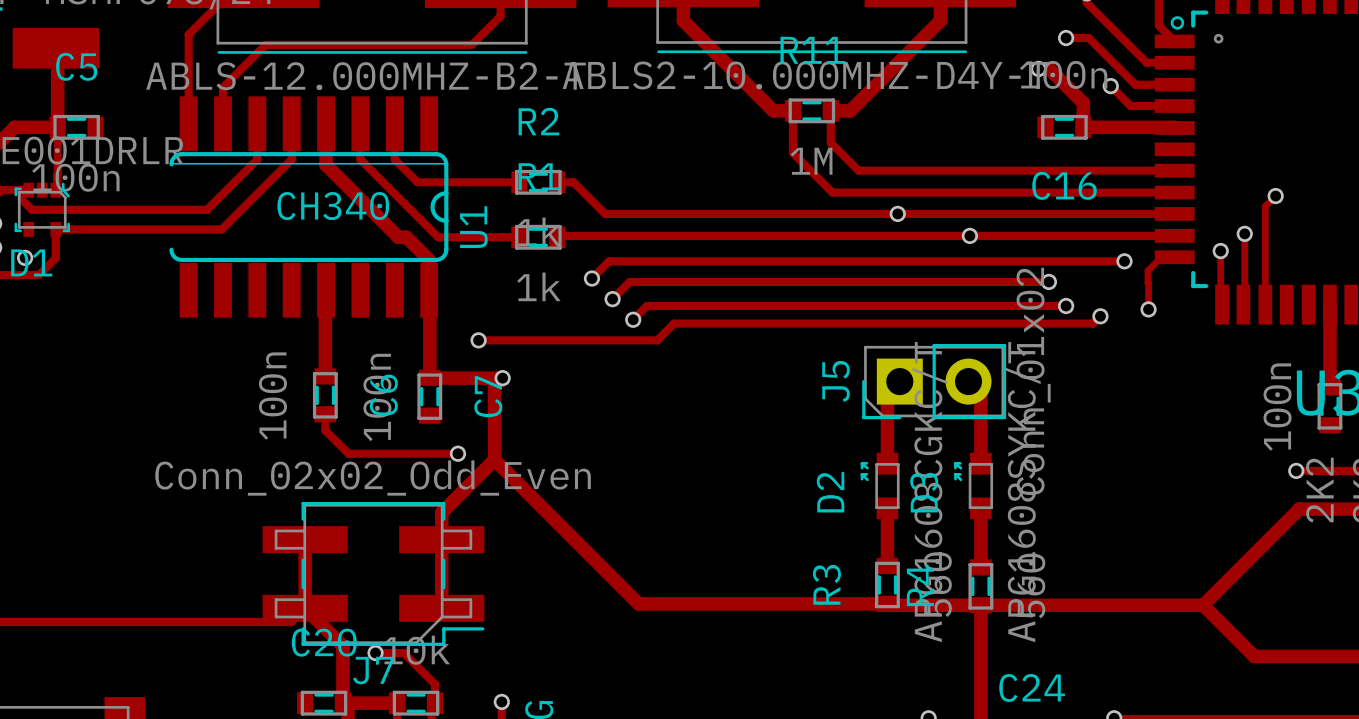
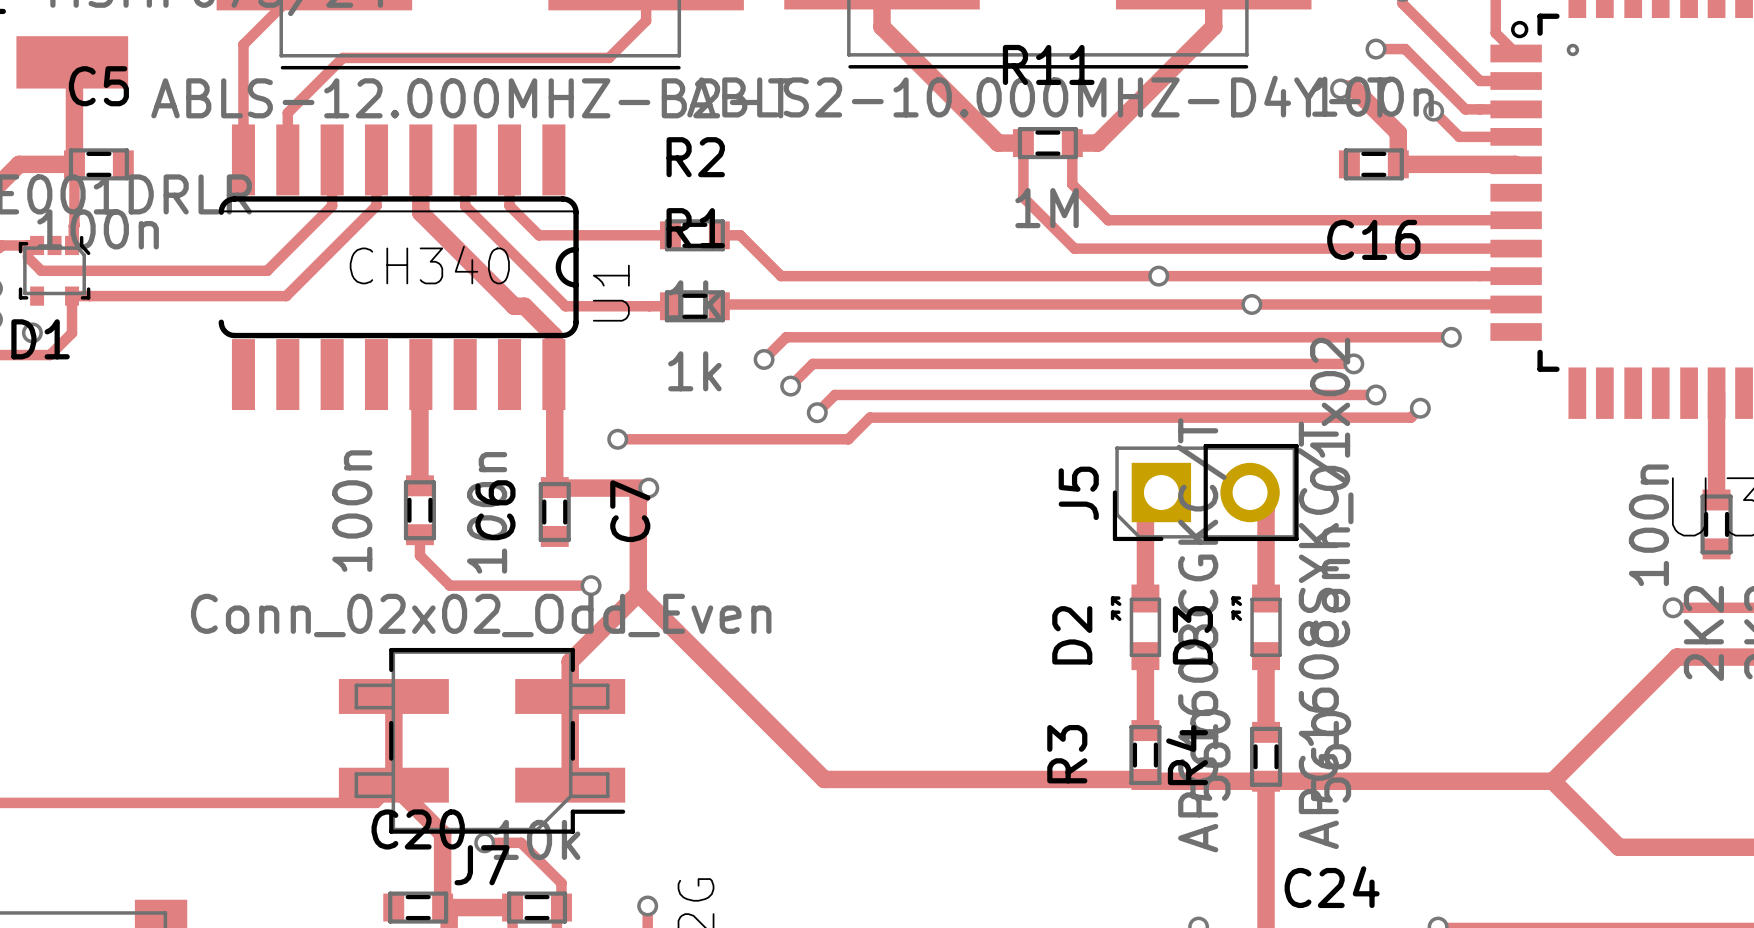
track: (1275, 196) (1265, 206) (1265, 304) -> none
via: (1275, 196) -> none
track: (1244, 233) (1243, 304) -> none
via: (1244, 233) -> none
track: (1220, 251) (1222, 304) -> none
via: (1220, 251) -> none
track: (1174, 257) (1161, 257) (1147, 270) (1148, 309) -> none
via: (1148, 309) -> none

